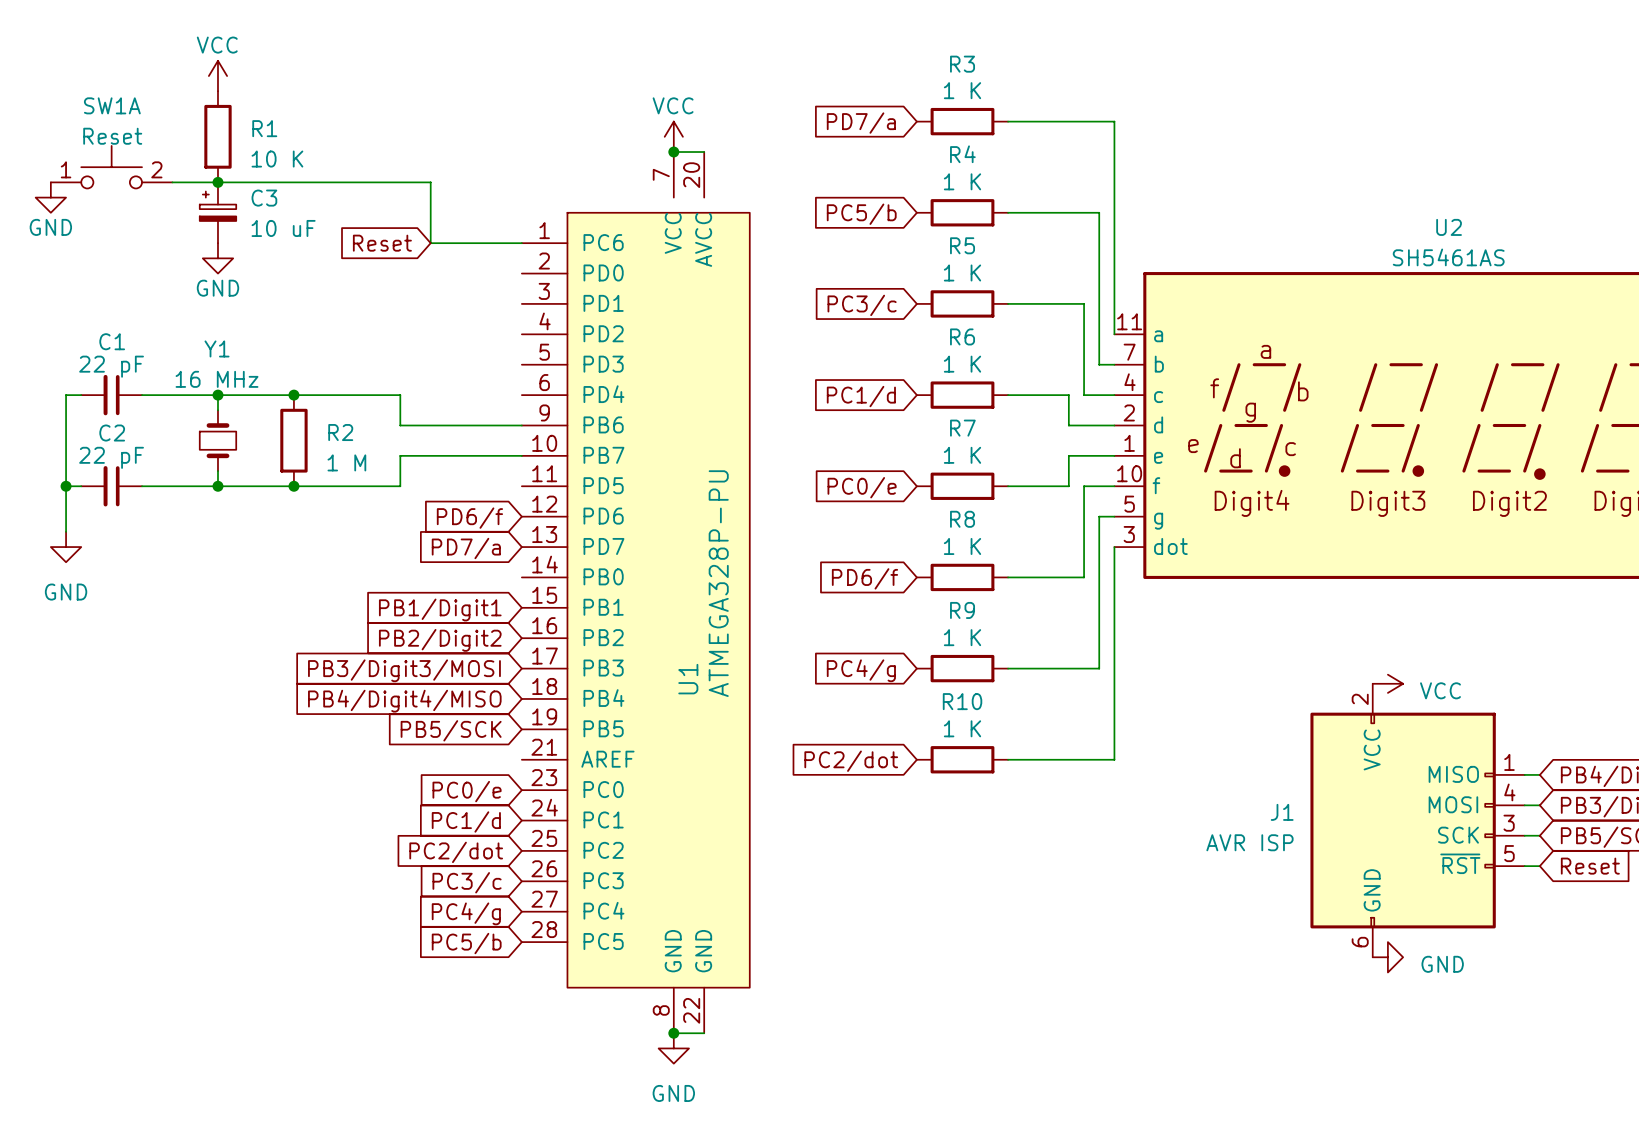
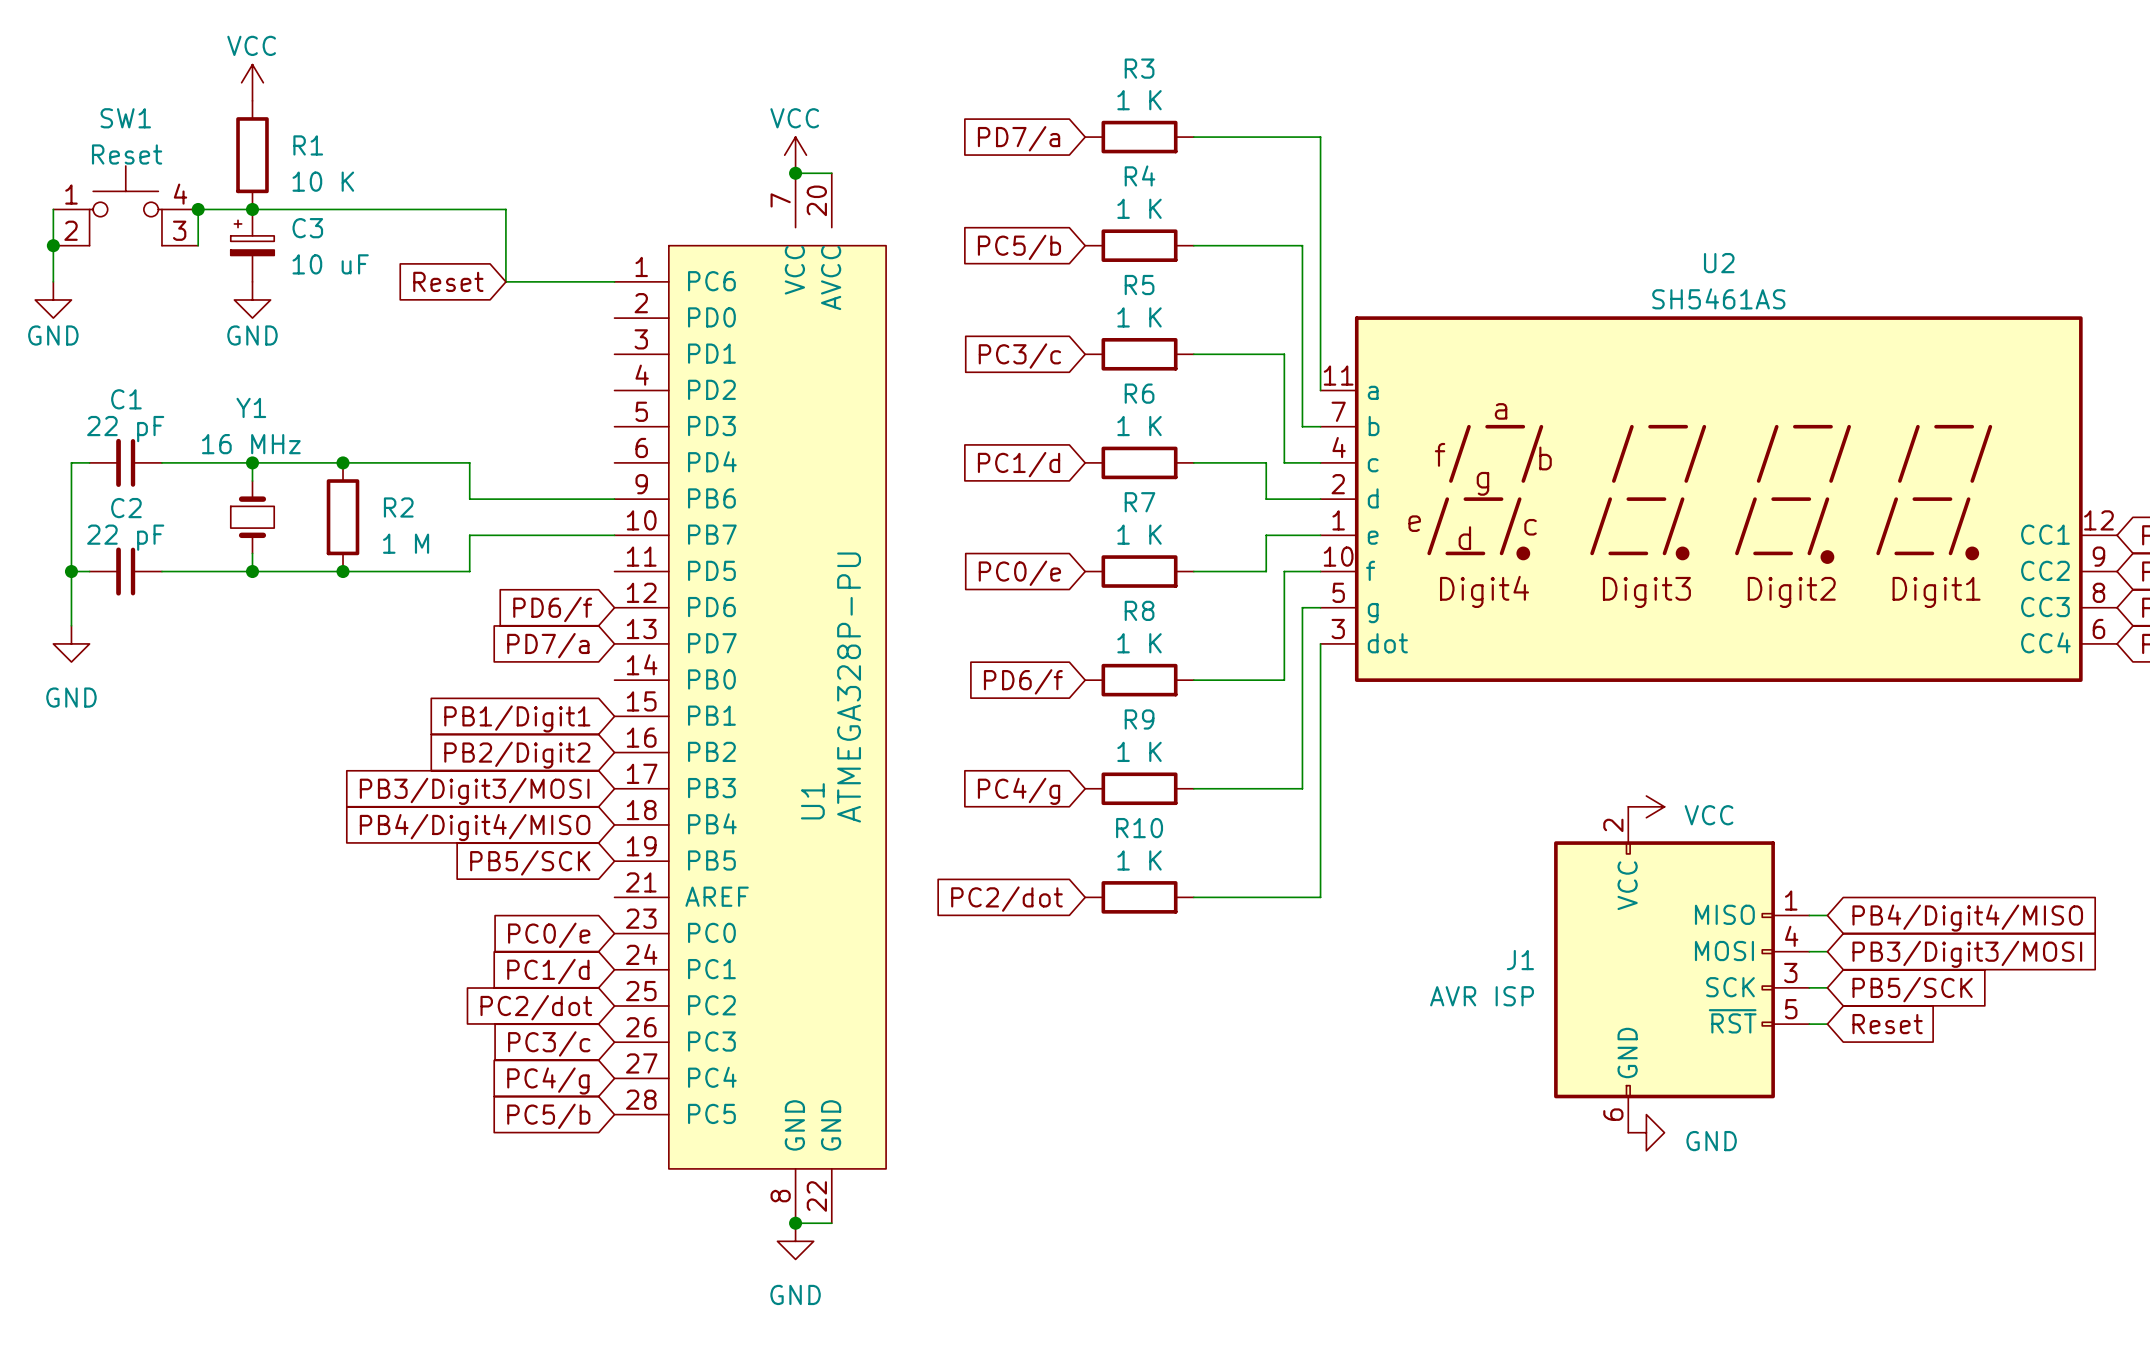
SW1A: Reset (111, 167) -> none
SW1: none -> Reset (125, 205)
wire: none -> (53, 209) (53, 281)
wire: none -> (198, 209) (198, 245)
junction: none -> (198, 209)
power symbol position: GND (50, 197) -> GND (53, 299)
junction: none -> (53, 245)

